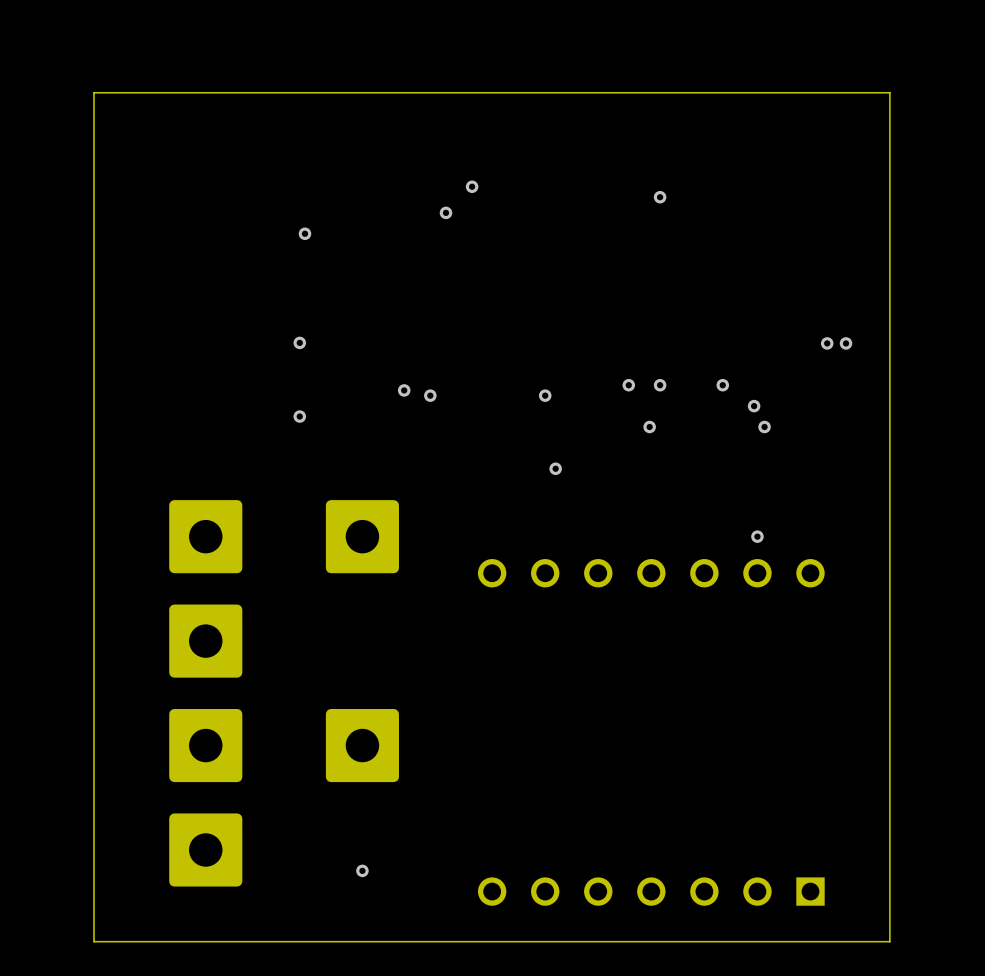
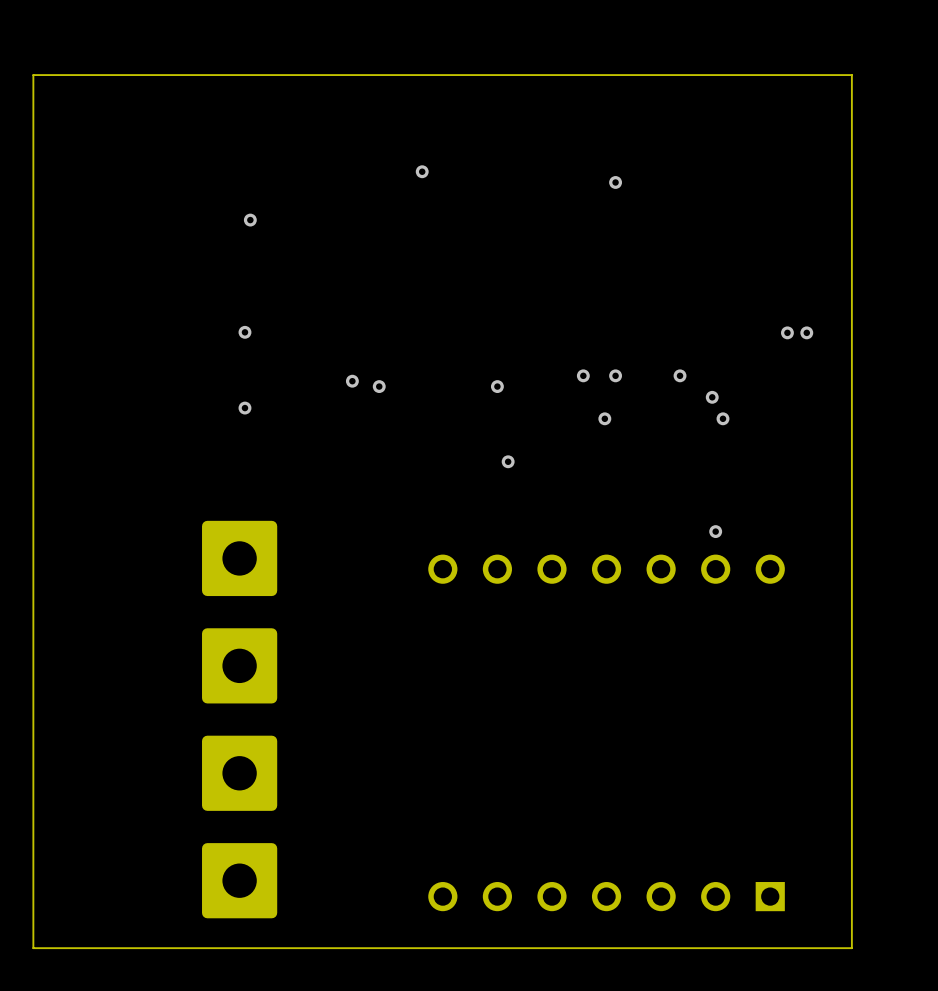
via: (445, 212) -> none
part: (205, 536) -> none
part: (362, 536) -> none
part: none -> (239, 558)
part: (205, 641) -> none
part: none -> (239, 665)
part: (205, 745) -> none
part: (362, 745) -> none
part: none -> (239, 773)
part: (205, 849) -> none
via: (362, 870) -> none
part: none -> (239, 880)

